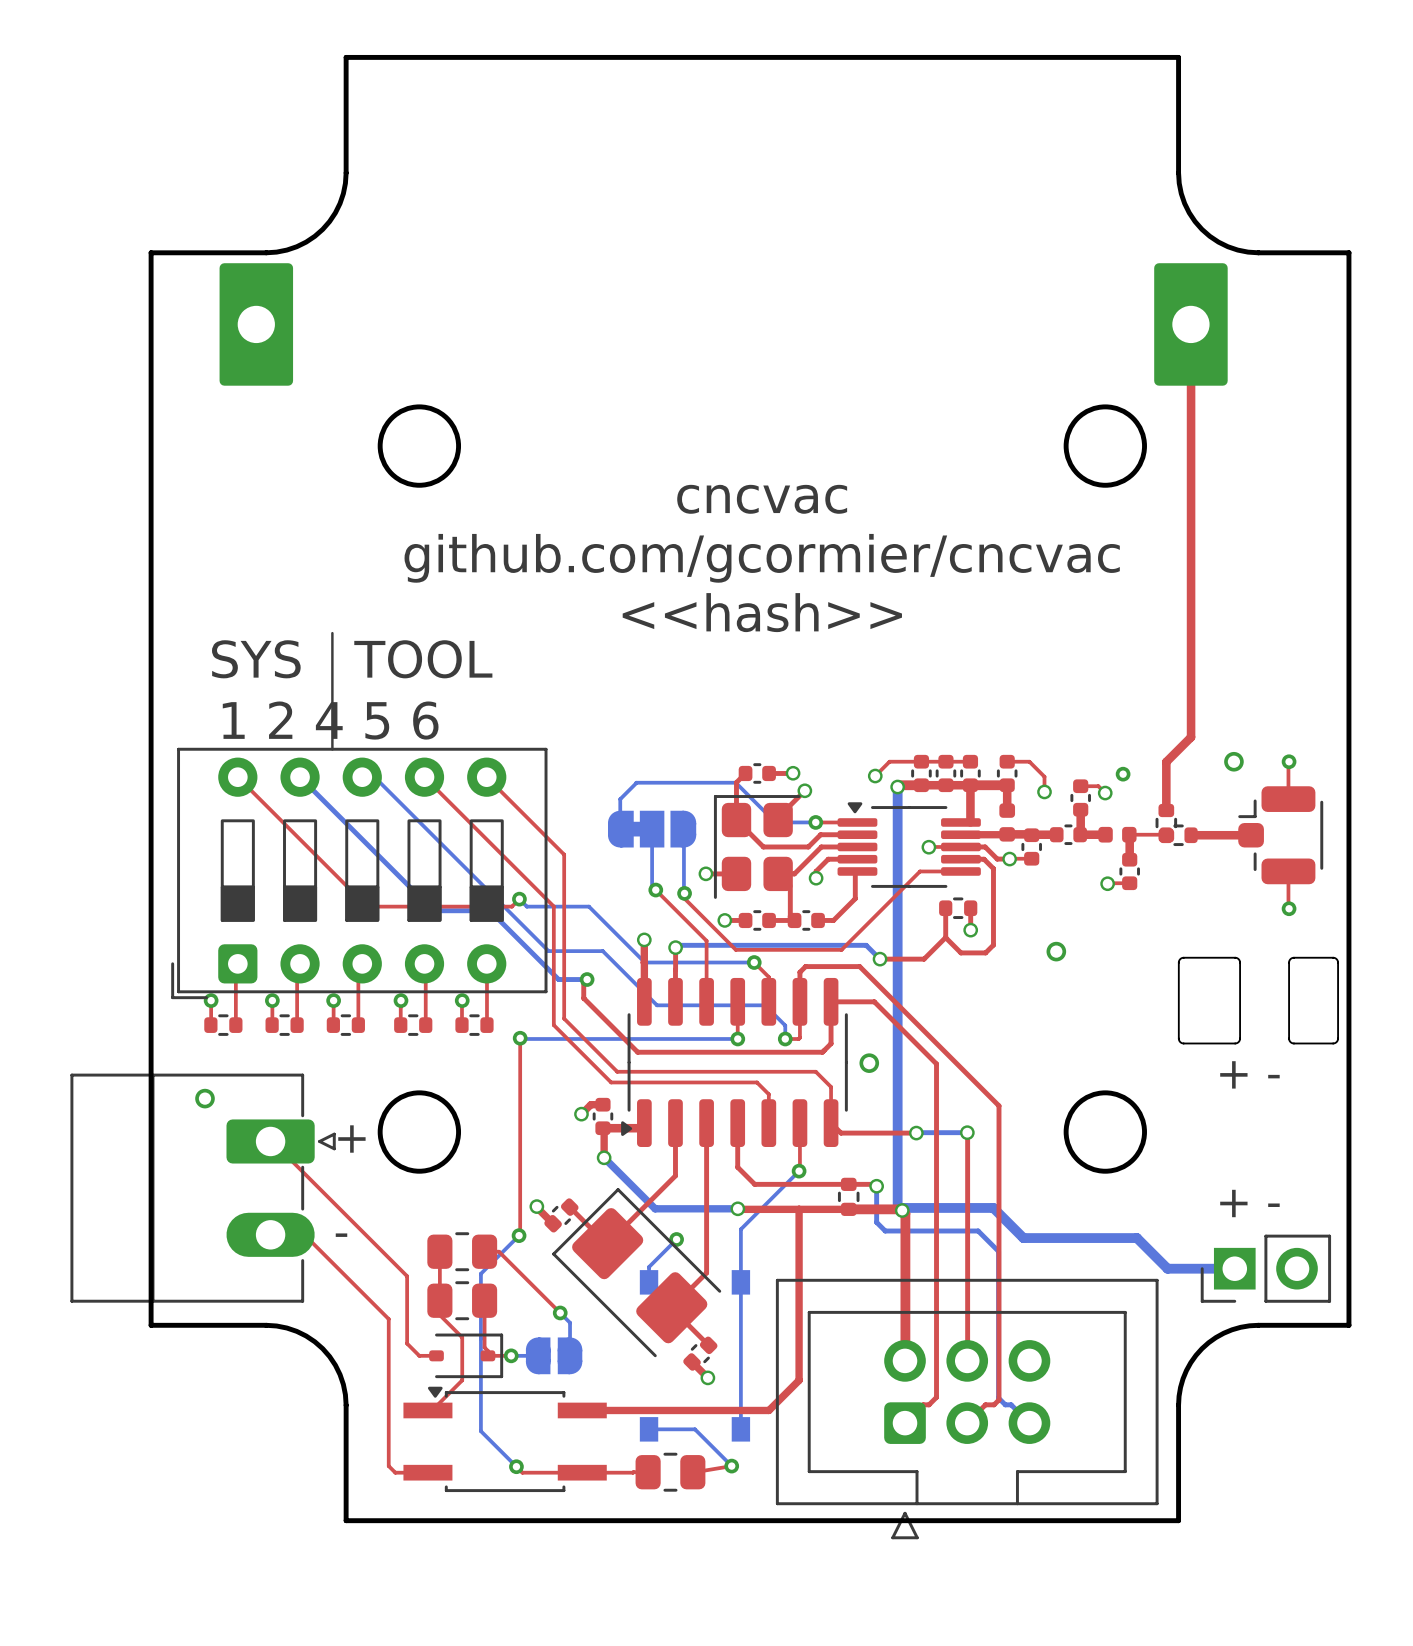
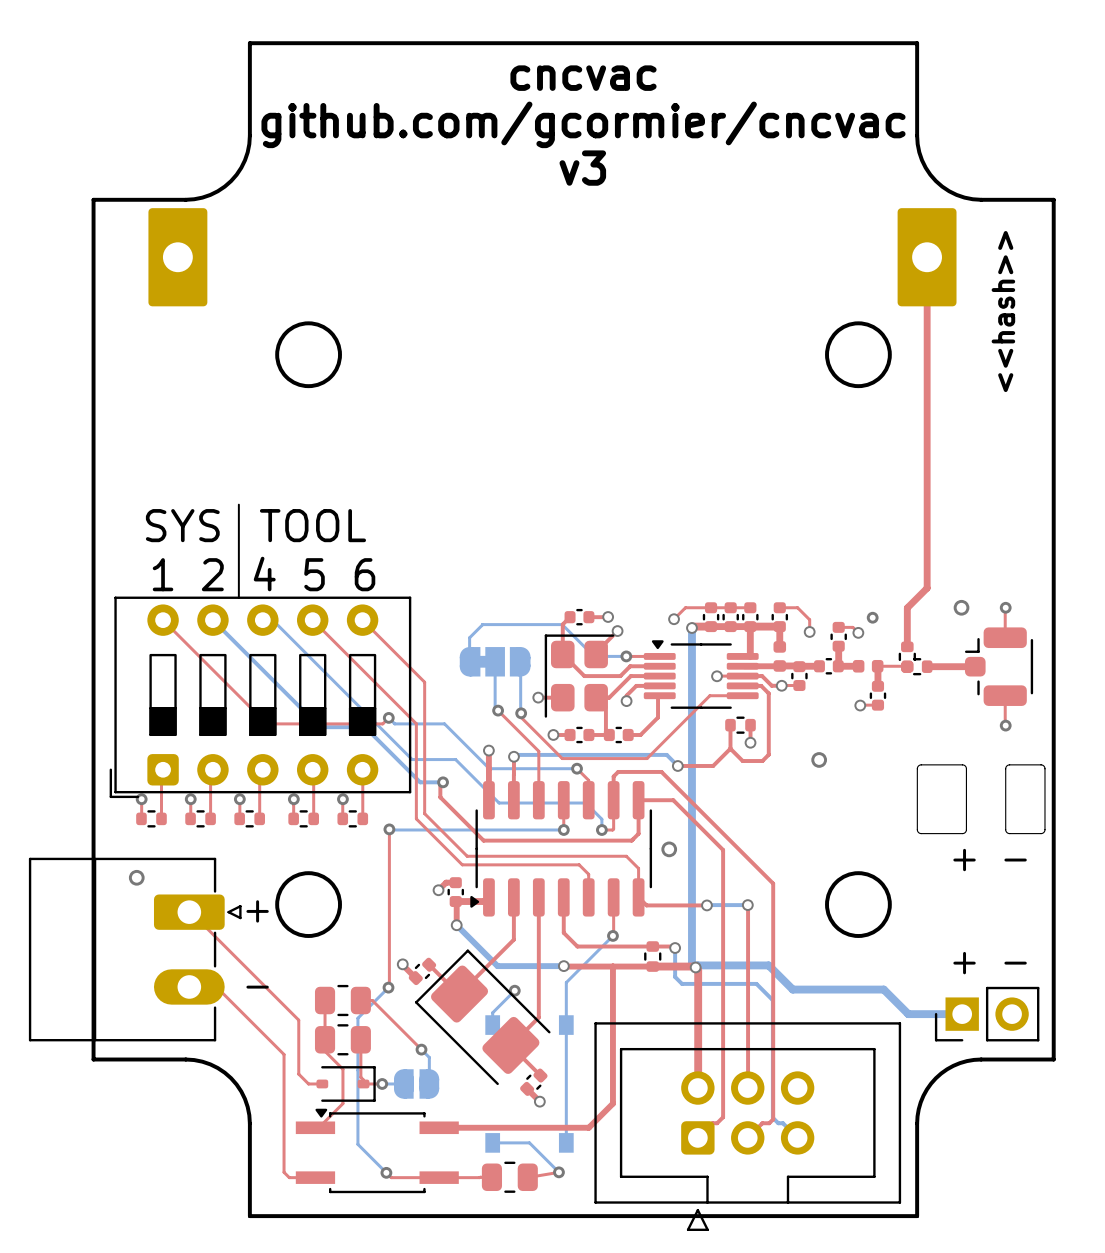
text: none -> v3 (582, 168)
text: none -> <<hash>> (1003, 311)
text position: cncvac (762, 499) -> cncvac (583, 78)
text position: github.com/gcormier/cncvac (762, 558) -> github.com/gcormier/cncvac (583, 124)
text: <<hash>> (762, 612) -> none

